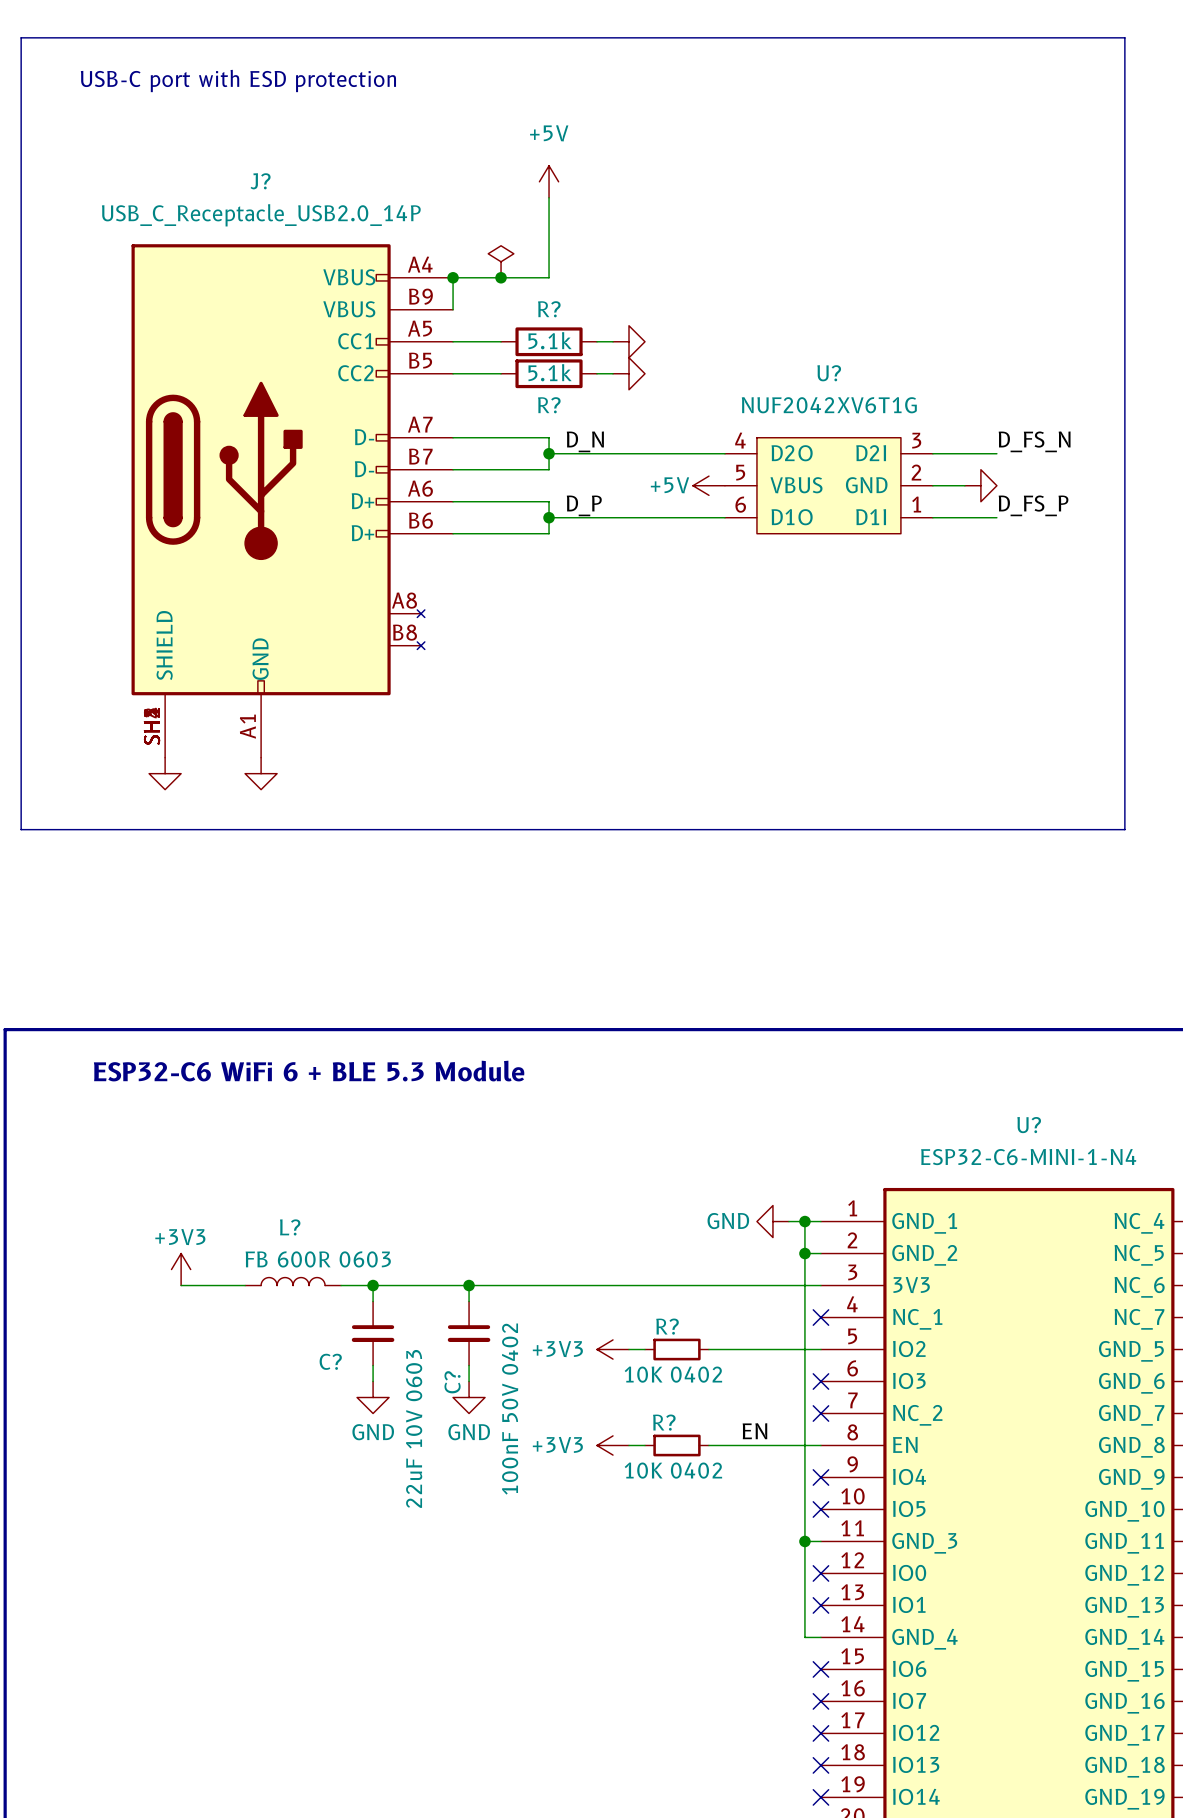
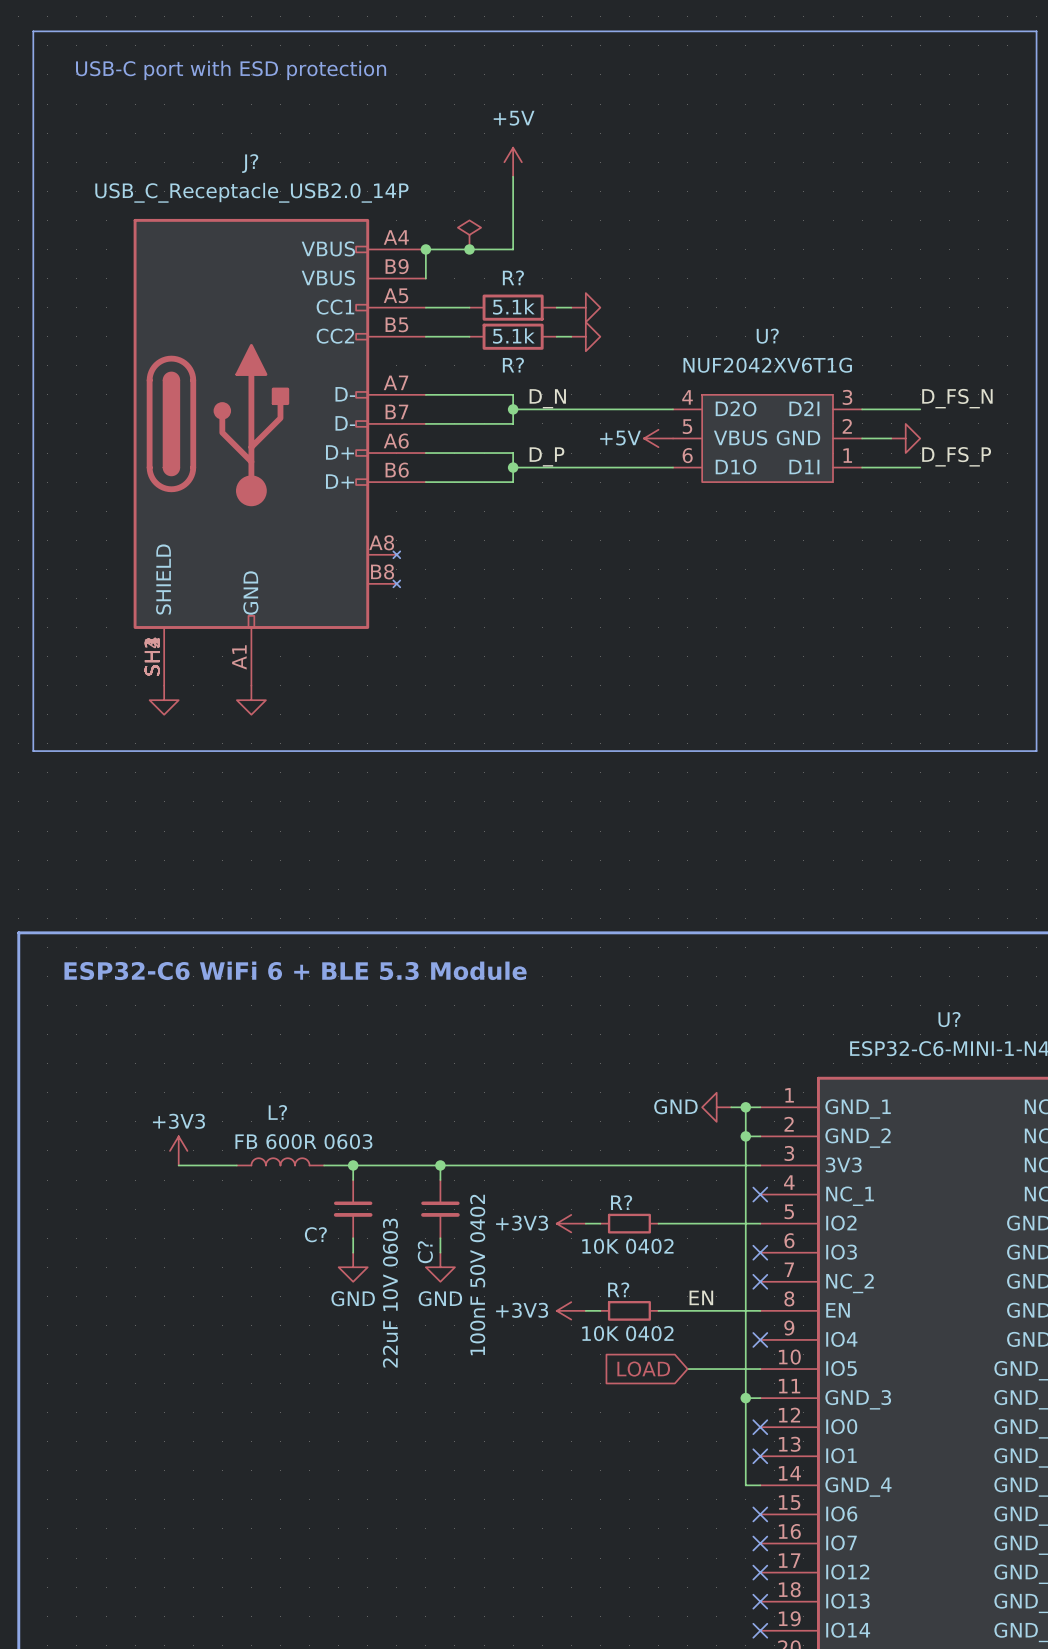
global label: none -> LOAD (643, 1369)
wire: none -> (687, 1369) (760, 1369)
no-connect mark: (820, 1509) -> none

